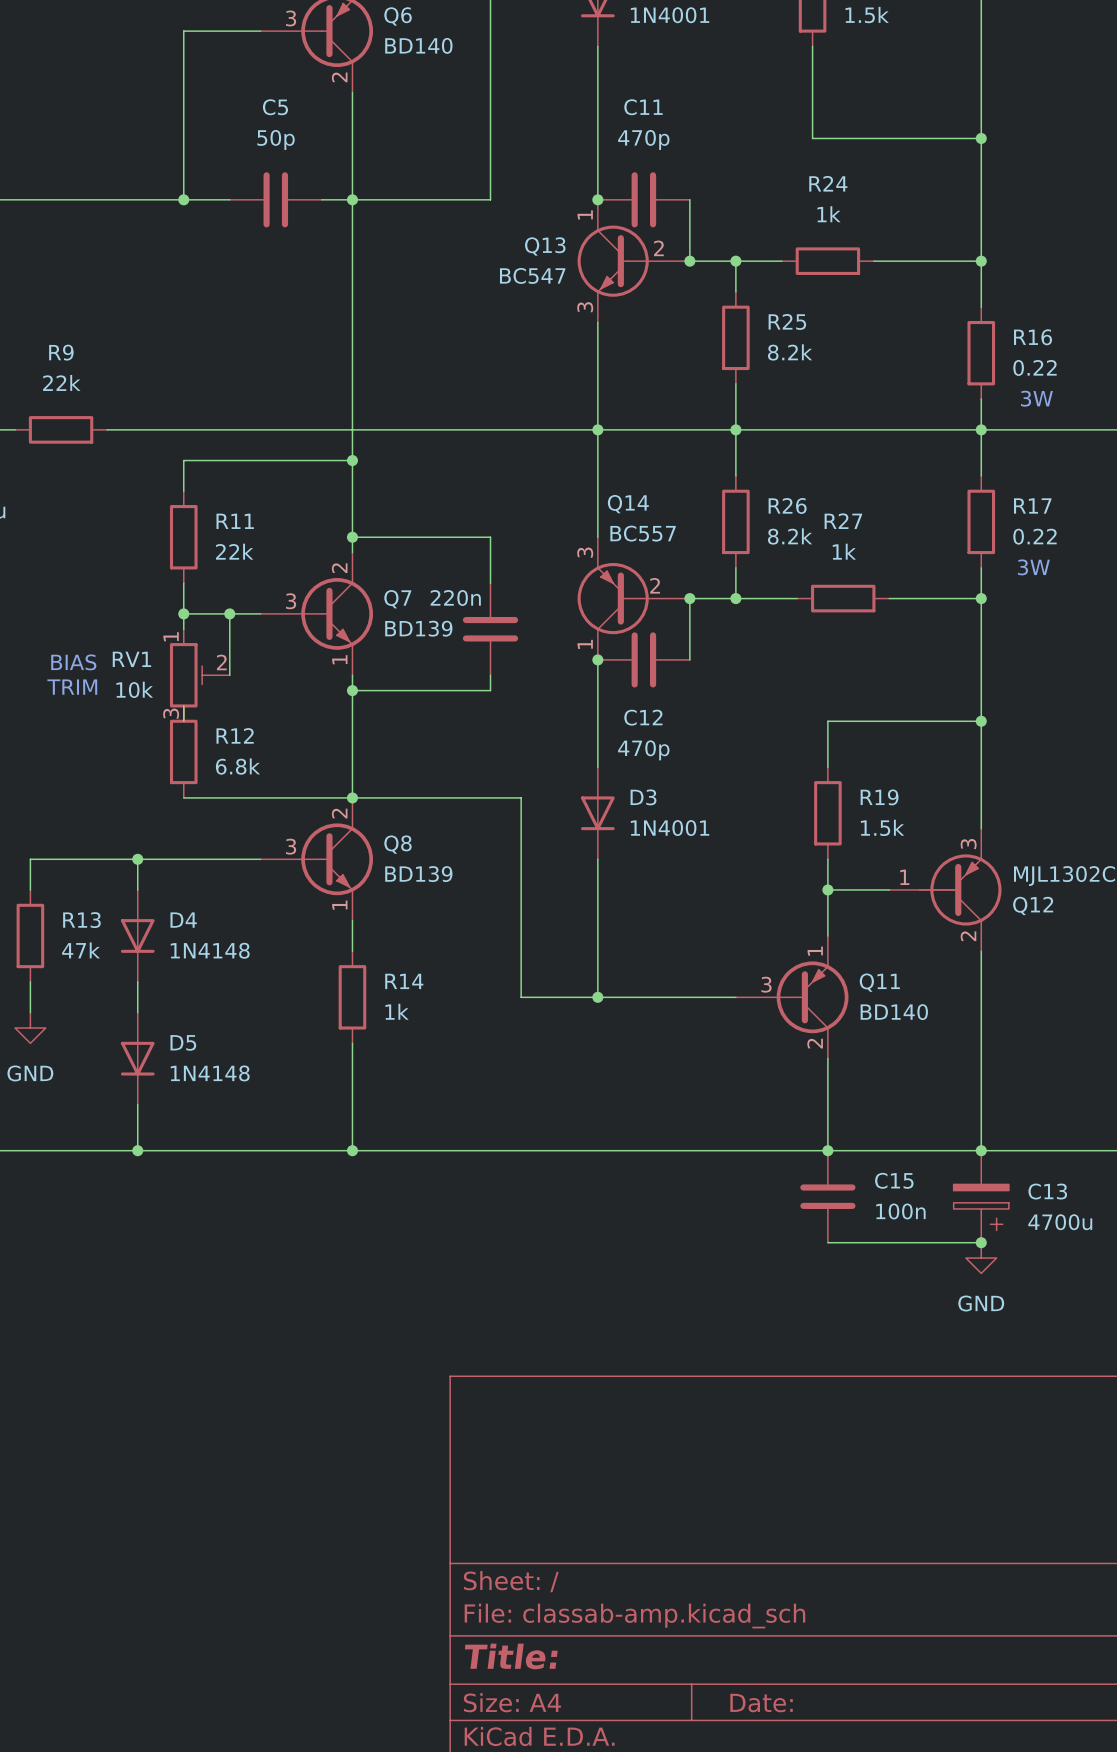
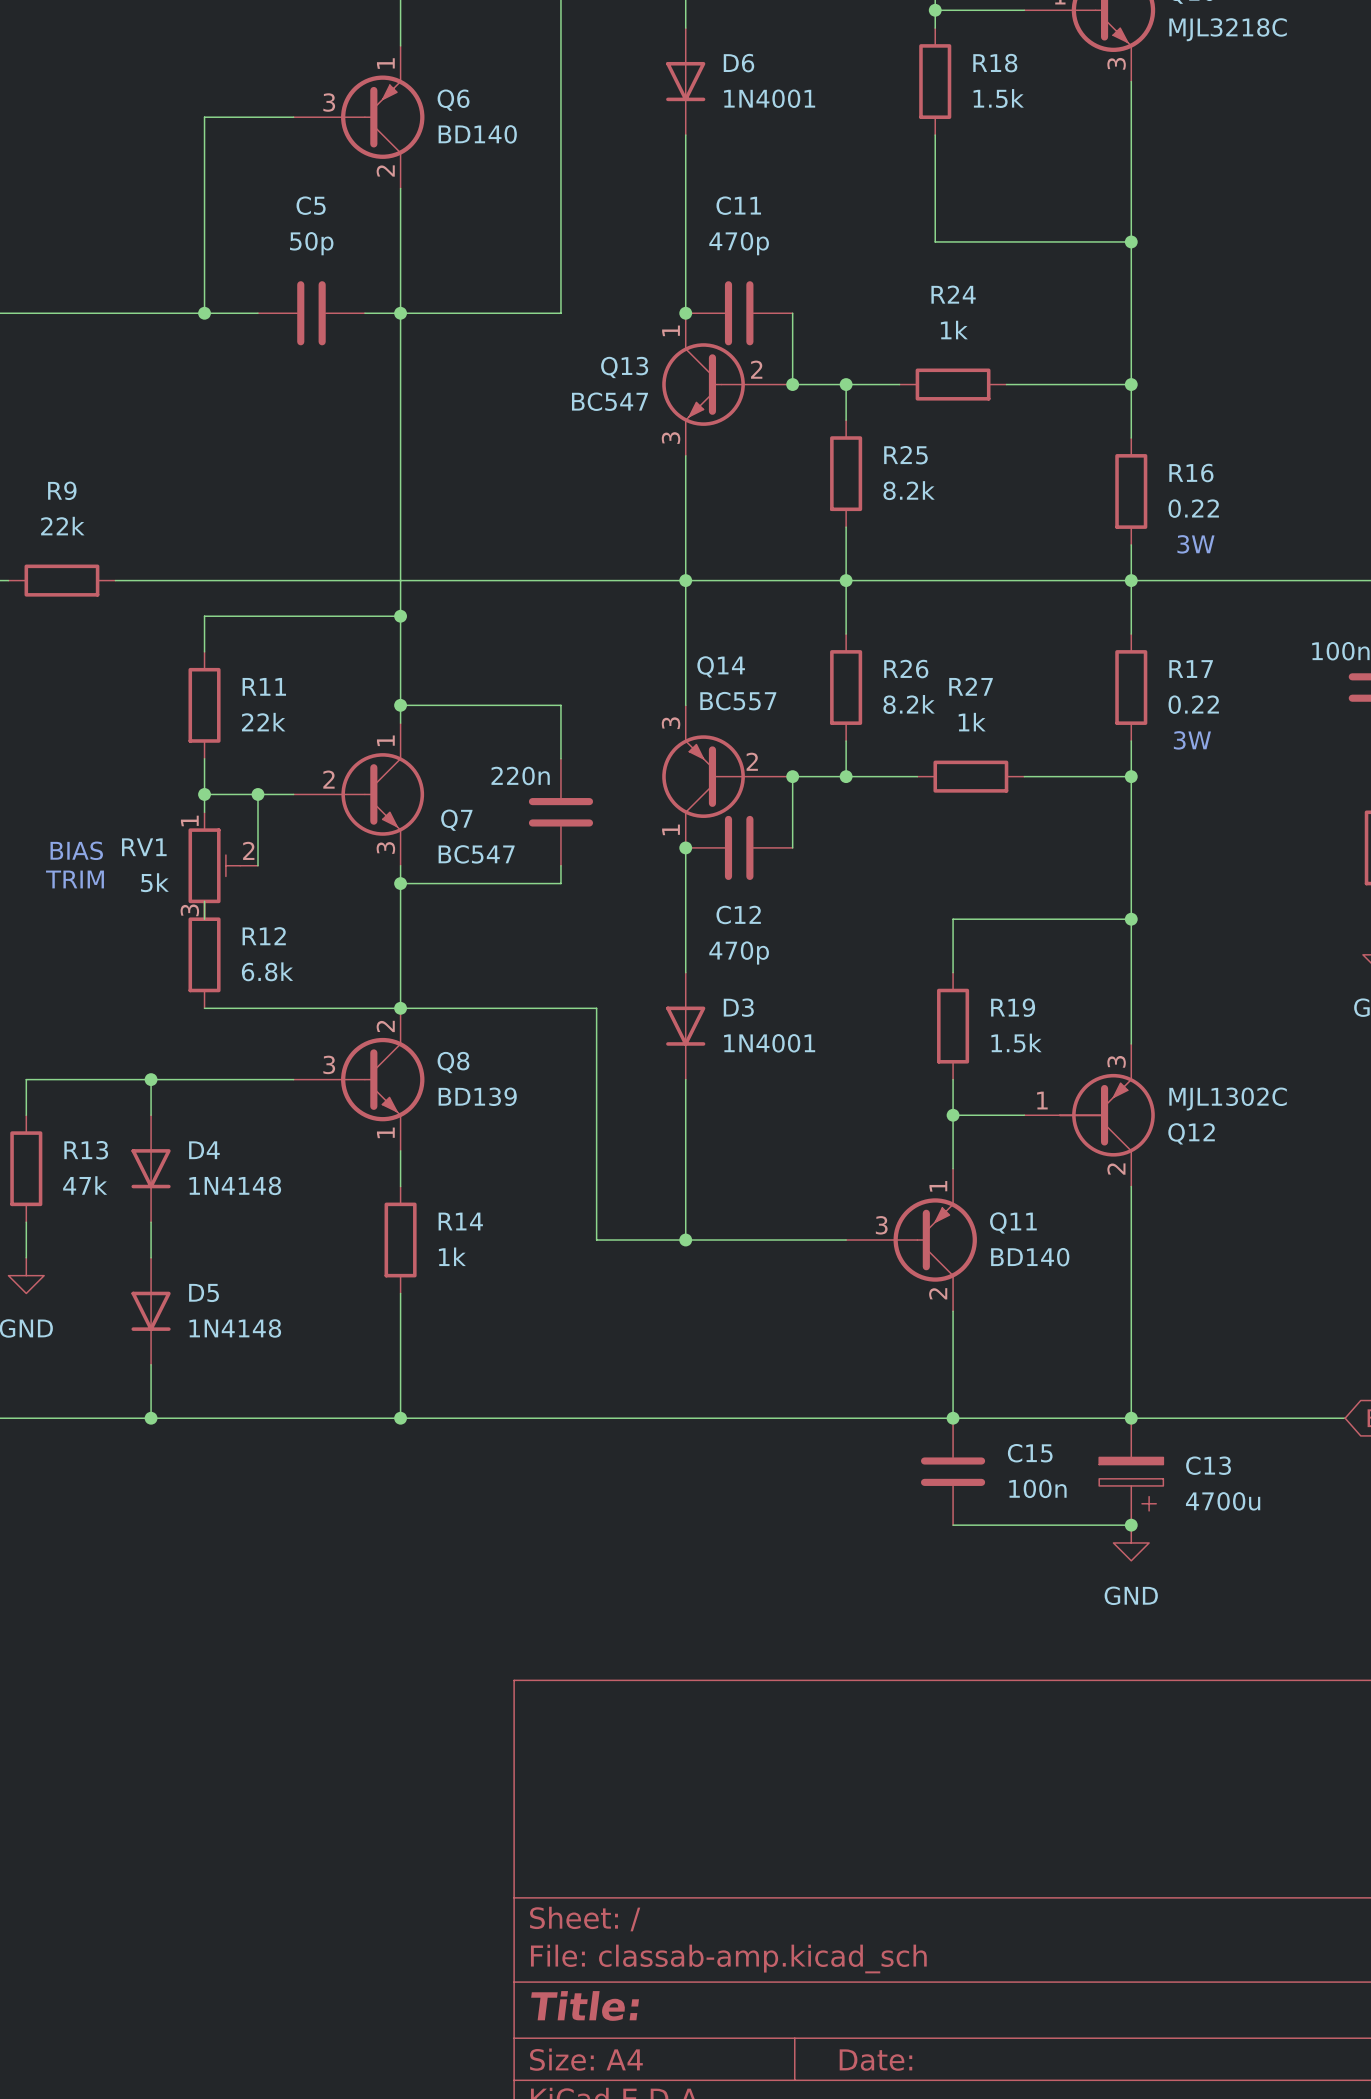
Q7 symbol: [260, 552, 374, 676] -> [293, 723, 425, 866]
Q7 name position: Q7 (397, 599) -> Q7 (456, 820)
Q7 value: BD139 (418, 628) -> BC547 (476, 854)
RV1 value: 10k (134, 689) -> 5k (154, 882)

